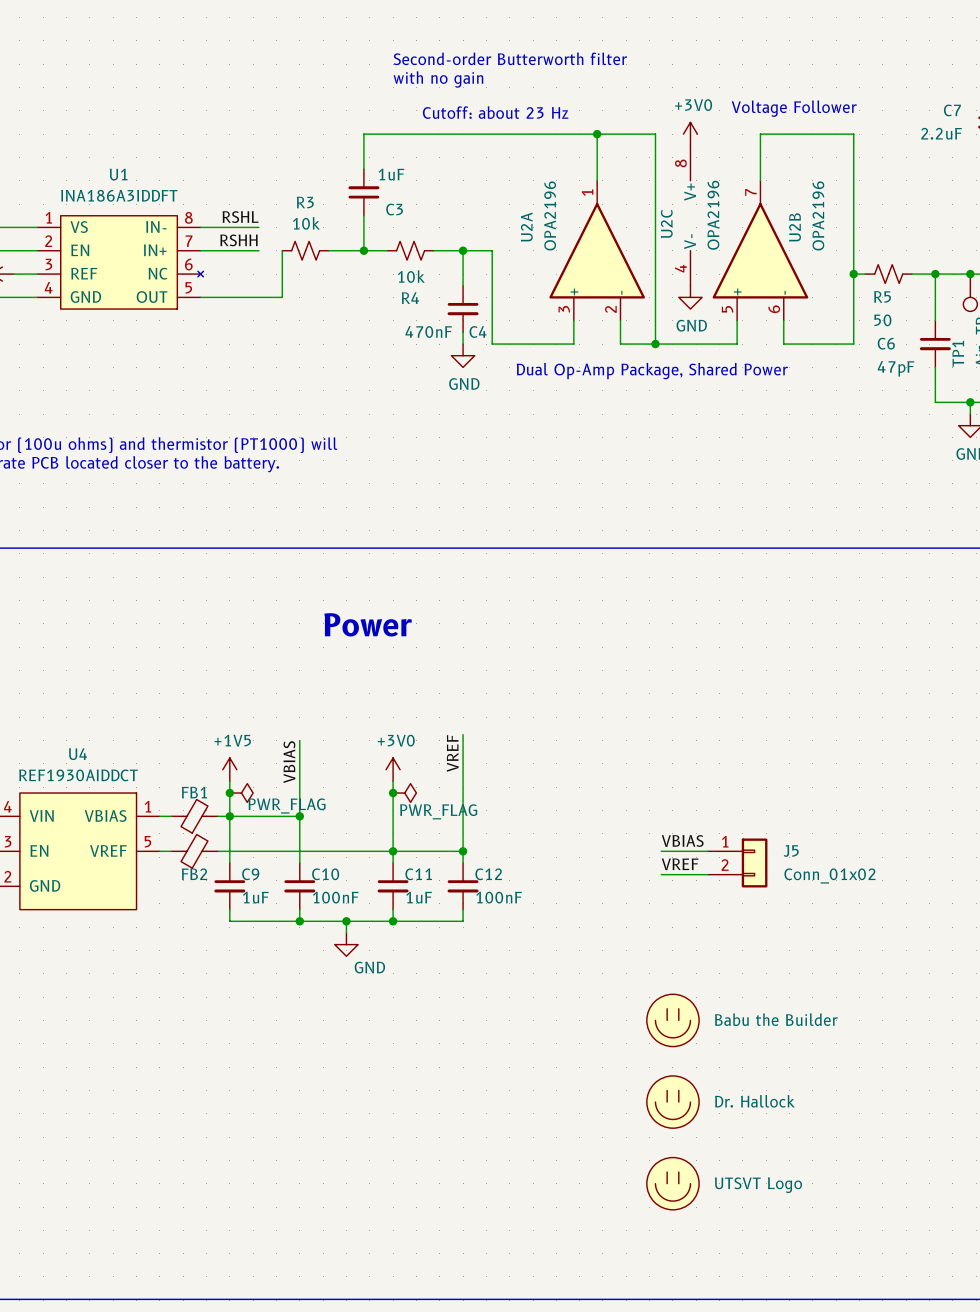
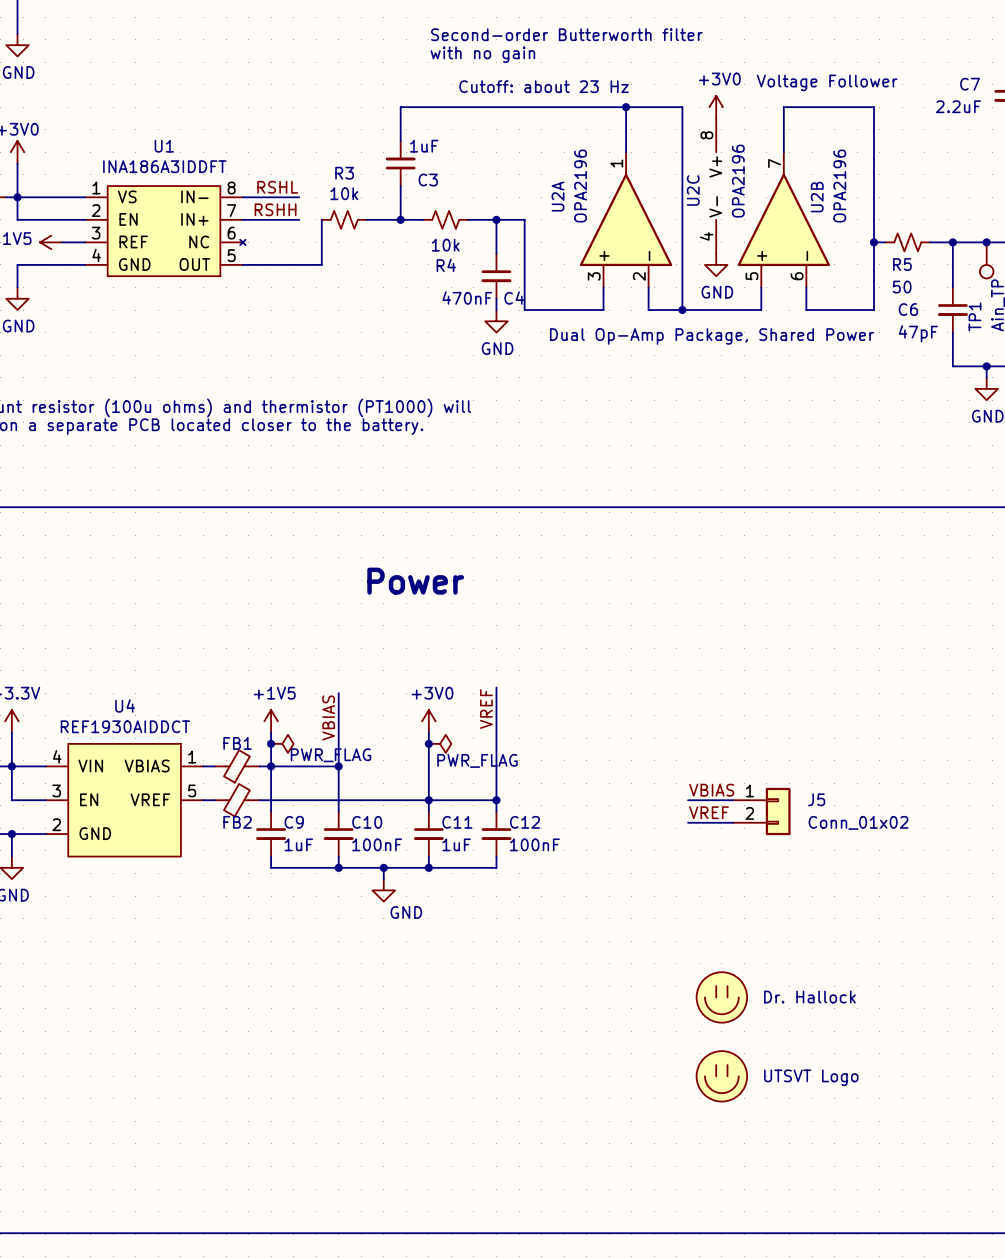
part: Babu the Builder (672, 1020) -> none
part position: (672, 1102) -> (721, 997)
part position: (672, 1183) -> (721, 1076)

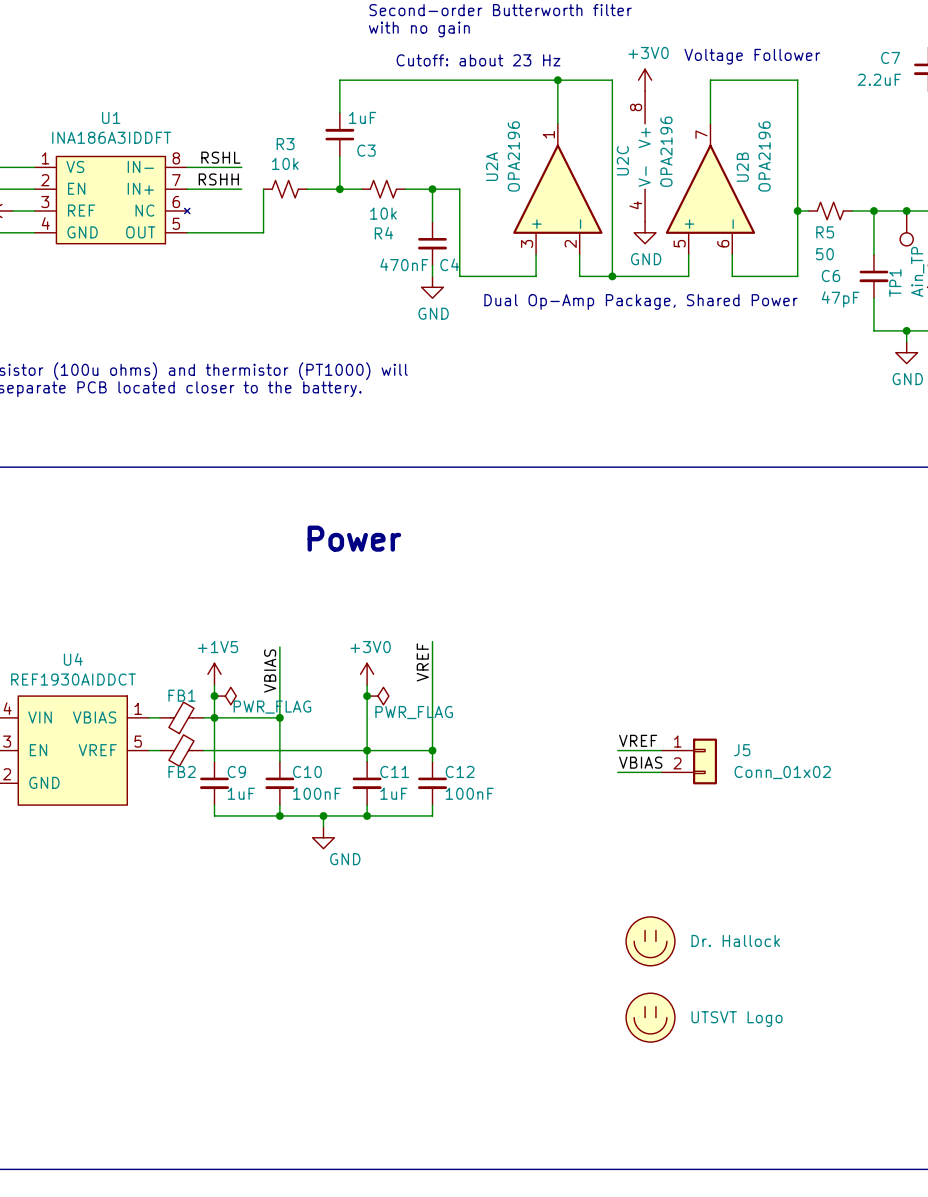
label: VBIAS (711, 790) -> VREF (638, 740)
label: VREF (709, 812) -> VBIAS (640, 762)

